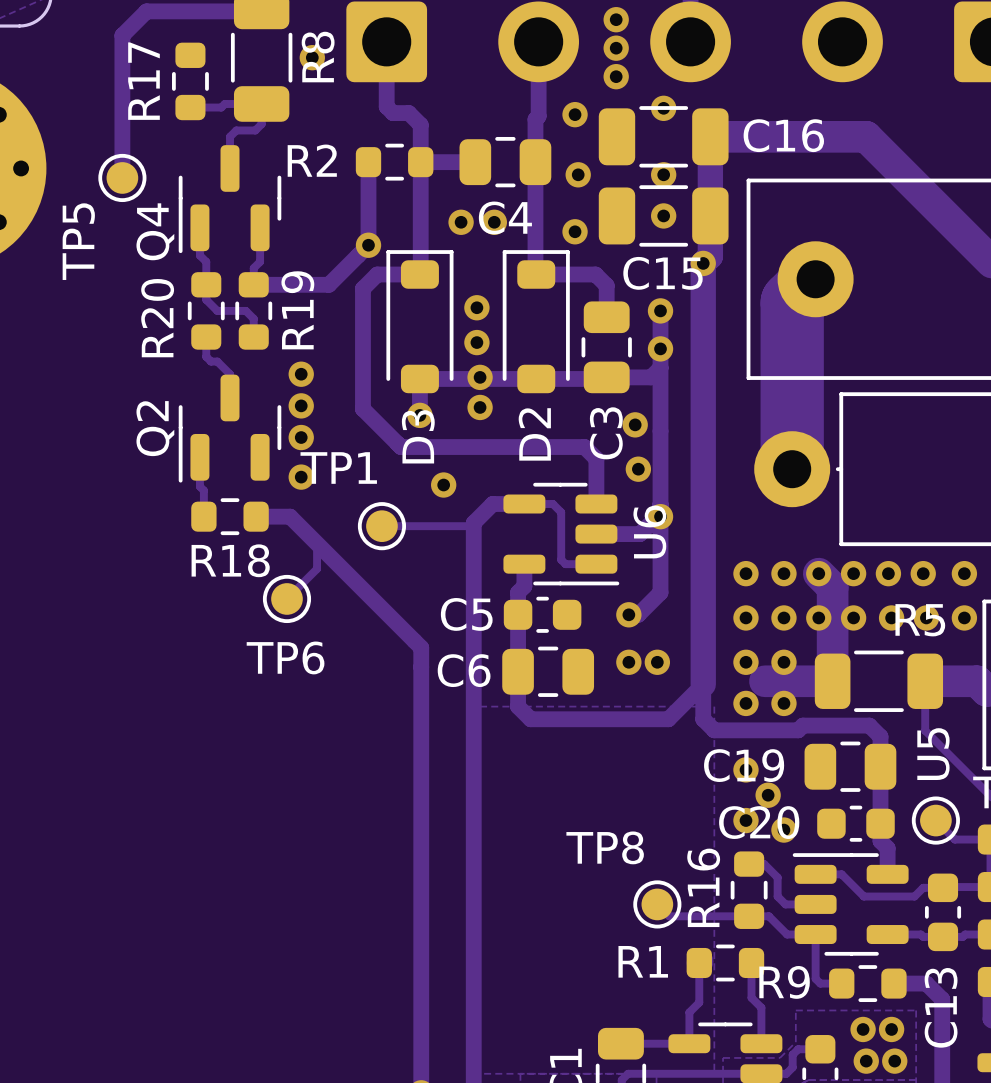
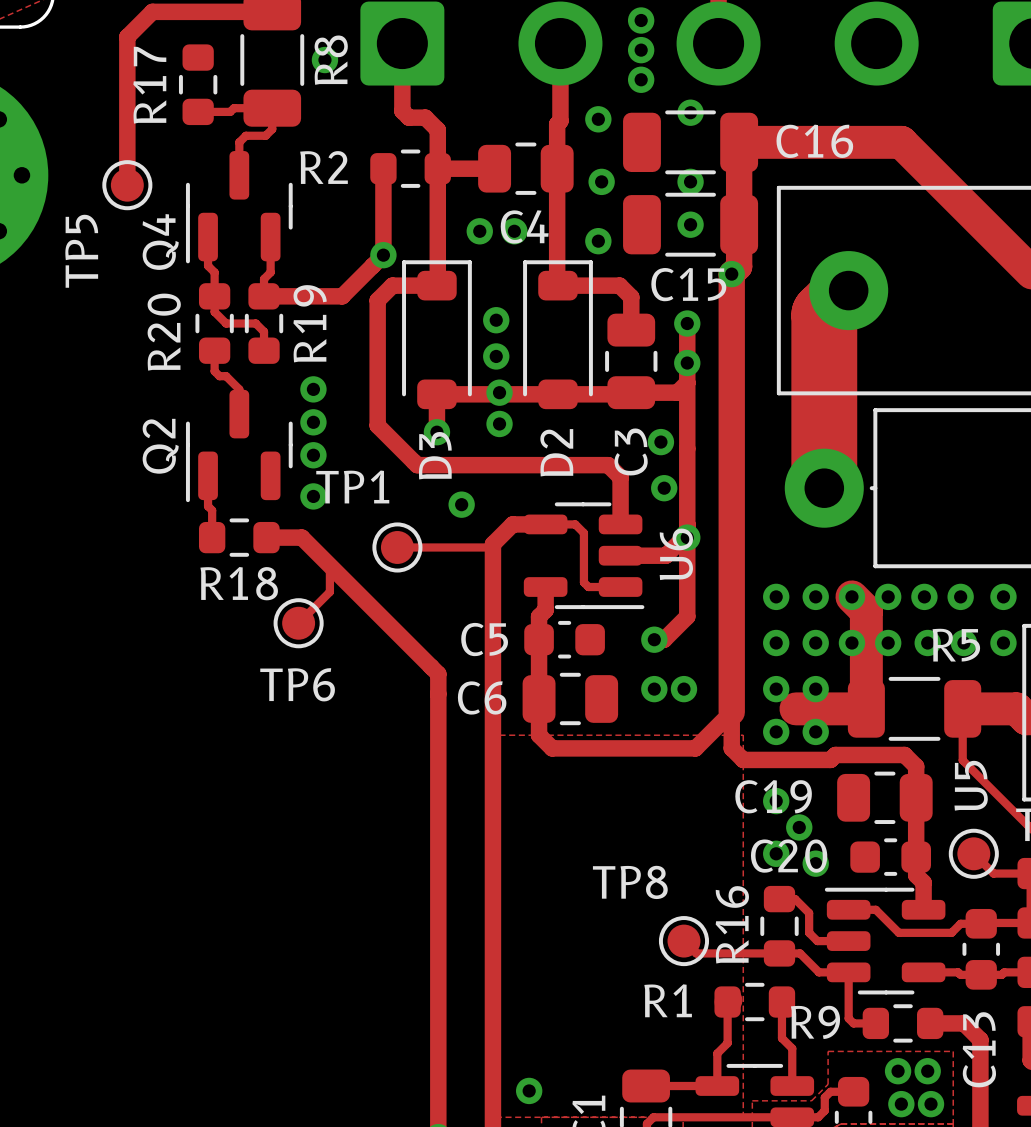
via: none -> (529, 1090)

